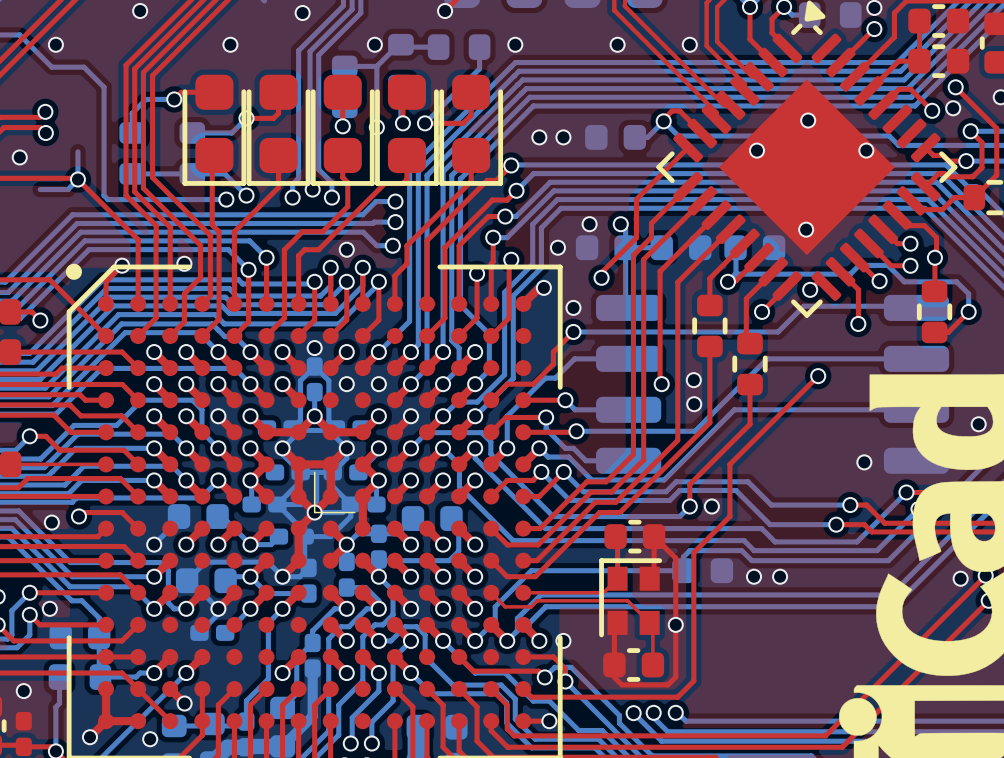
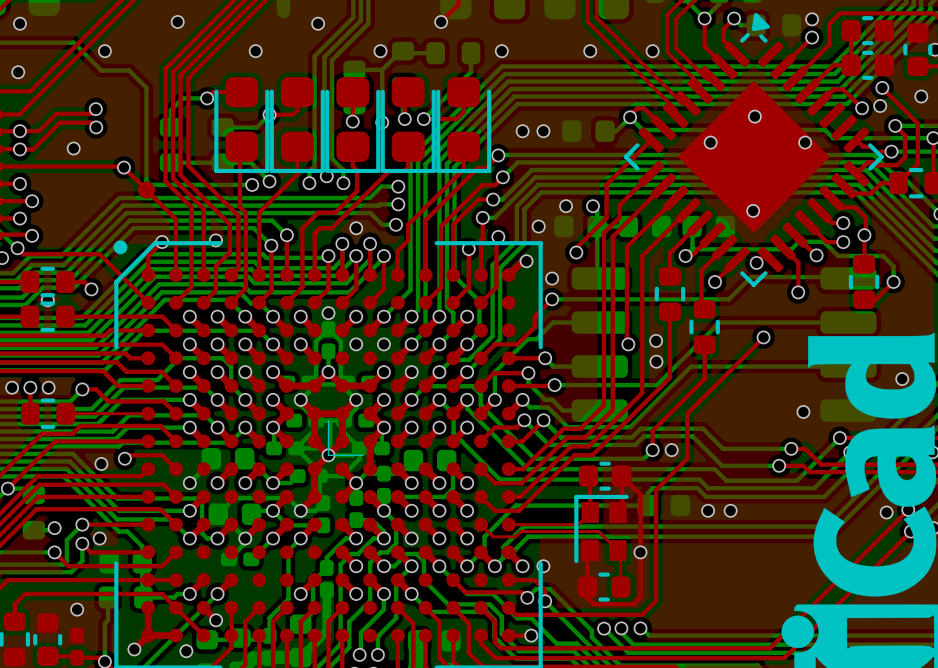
bottom track: (77, 151) (77, 179) (67, 189) (40, 189) -> none
part: none -> (146, 190)

